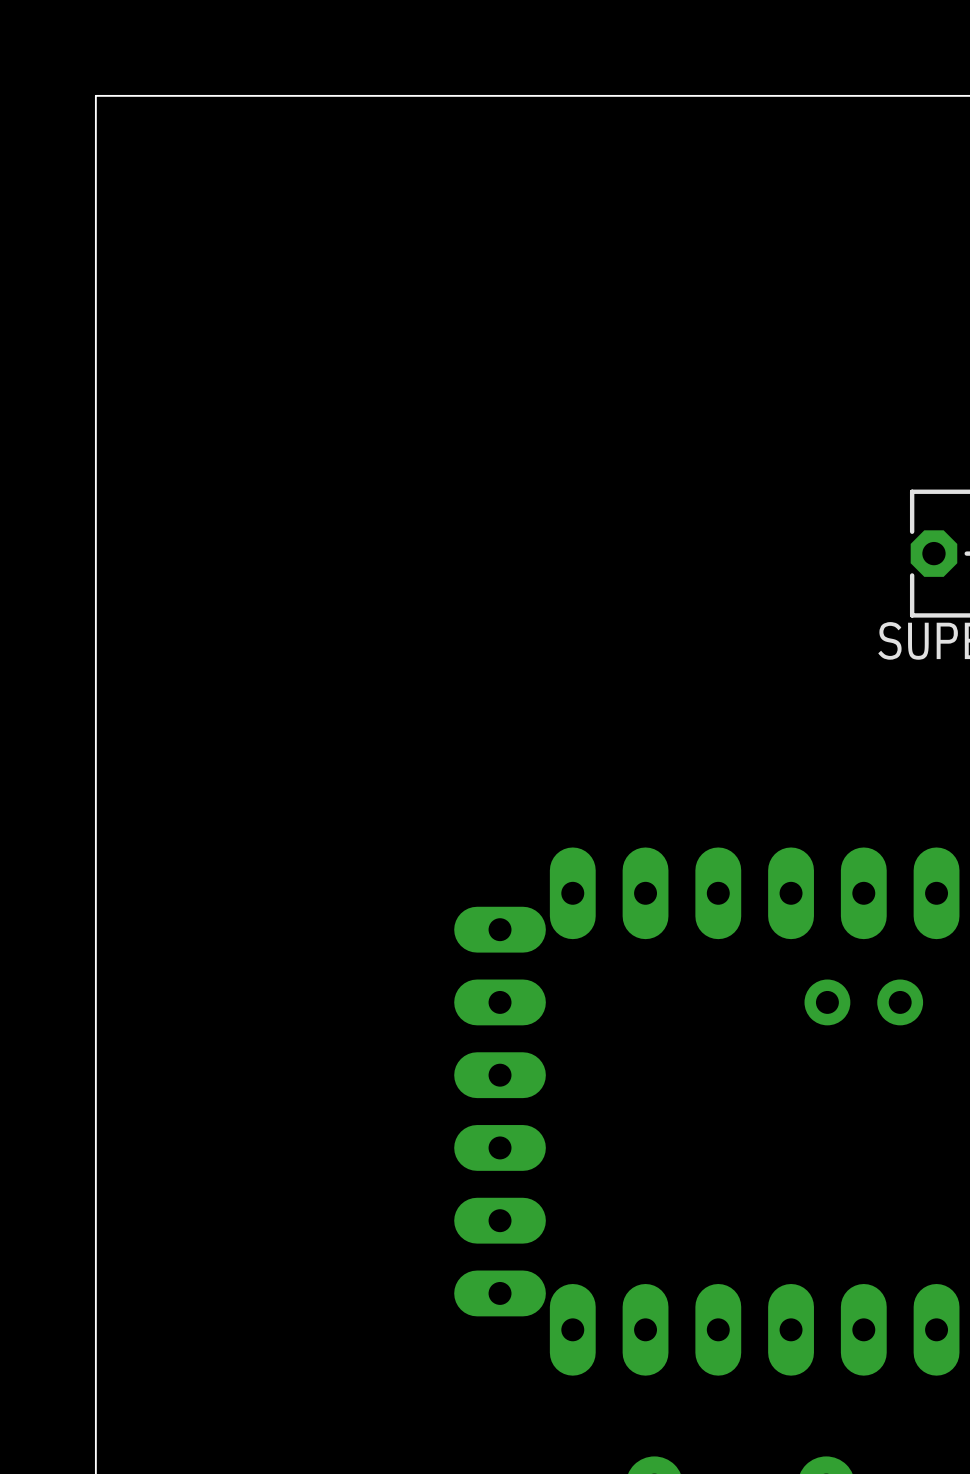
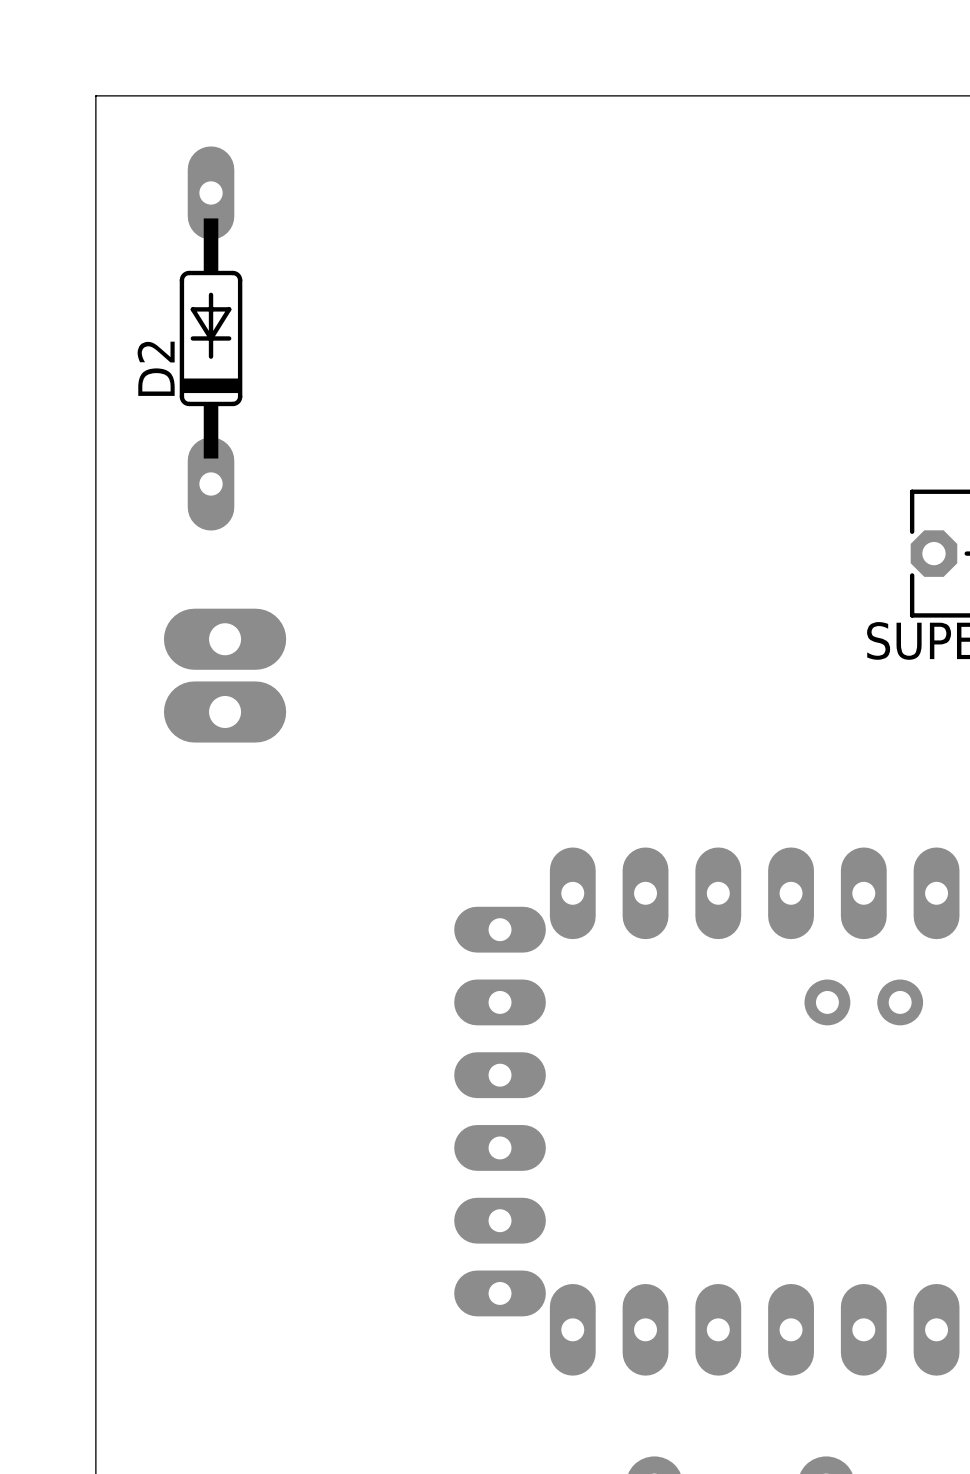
D2: none -> (211, 338)
part: none -> (225, 675)

